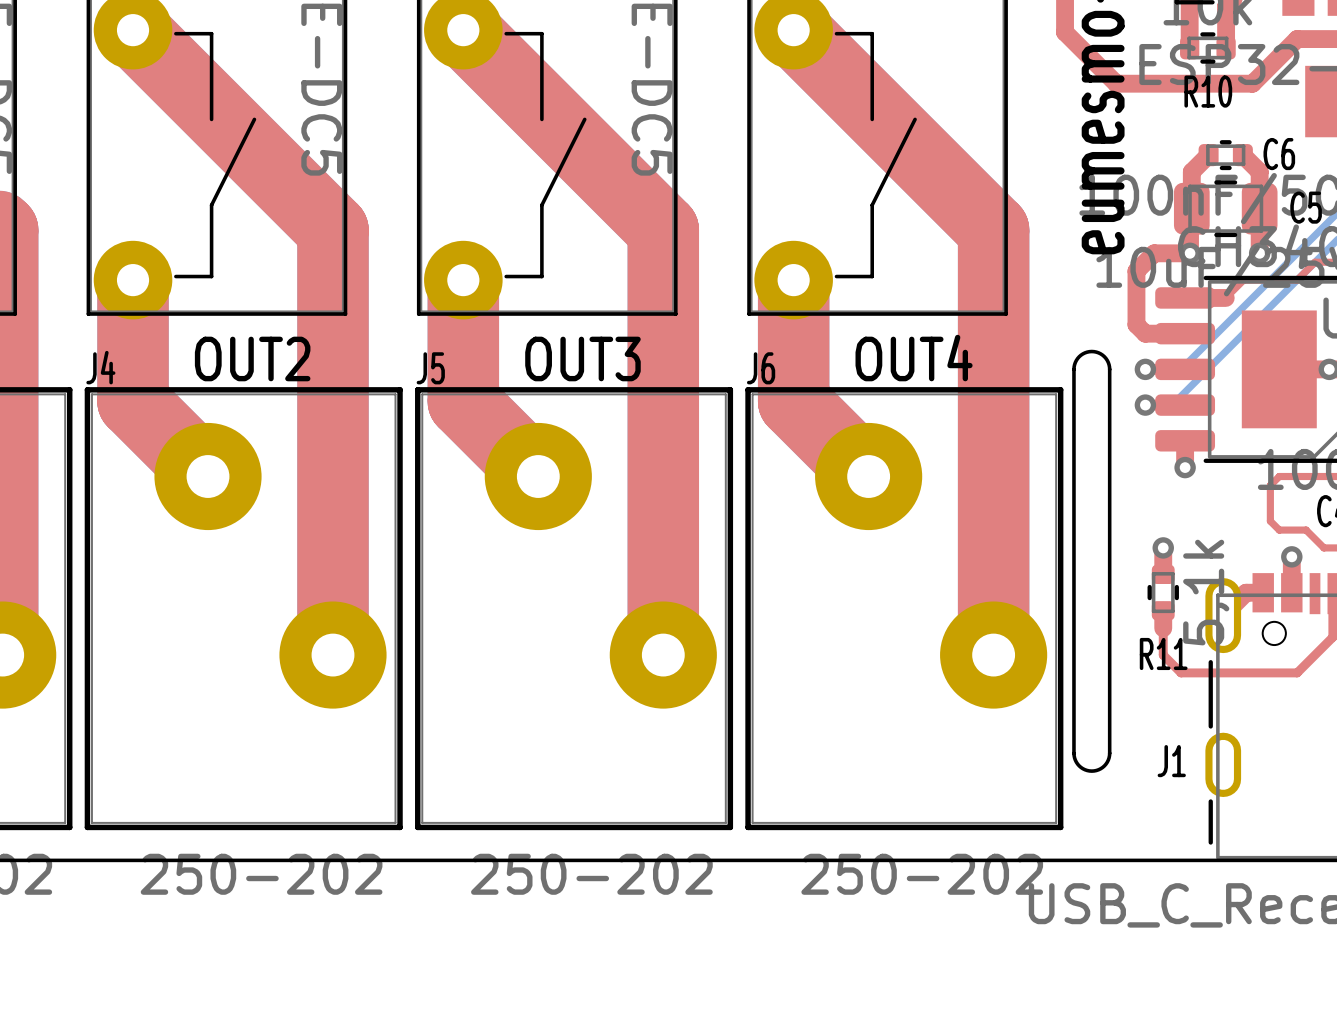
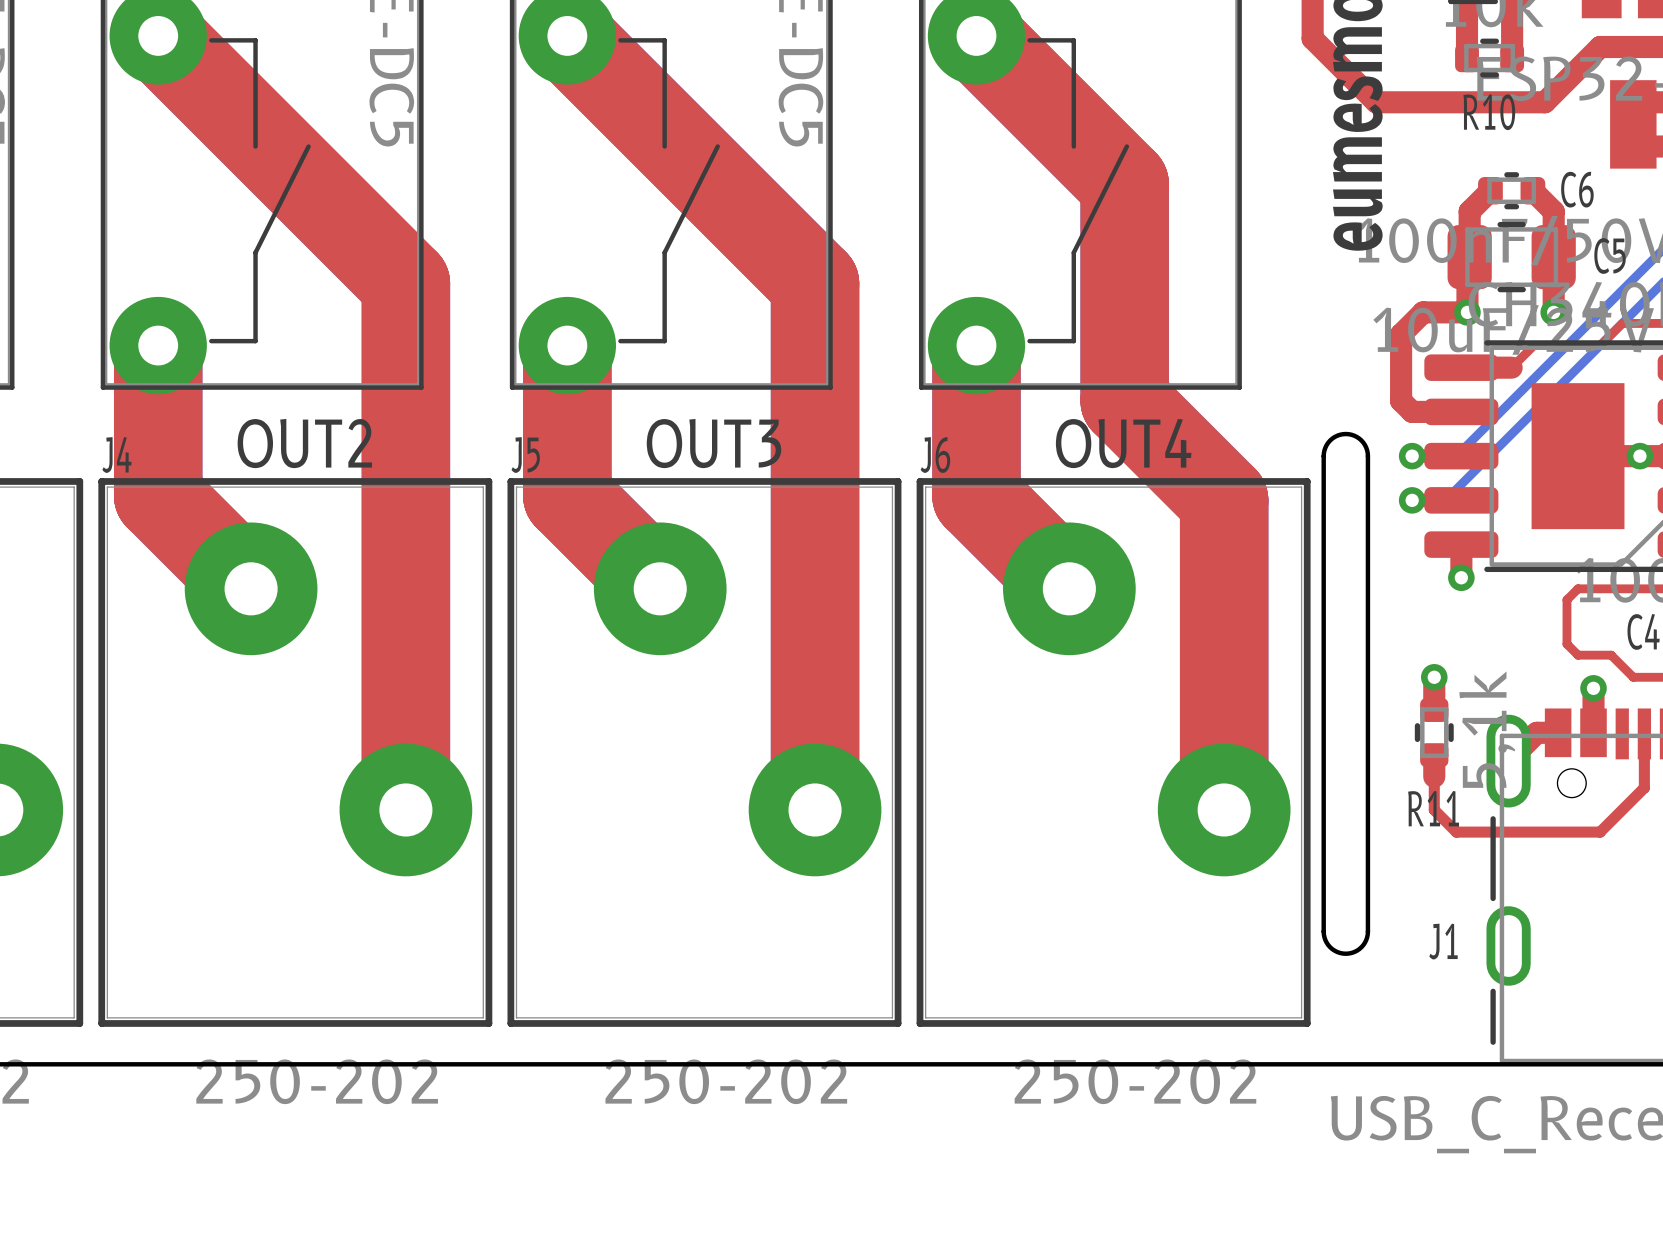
top track: (913, 149) (993, 230) (993, 405) -> (1124, 184) (1124, 400) (1224, 500)

